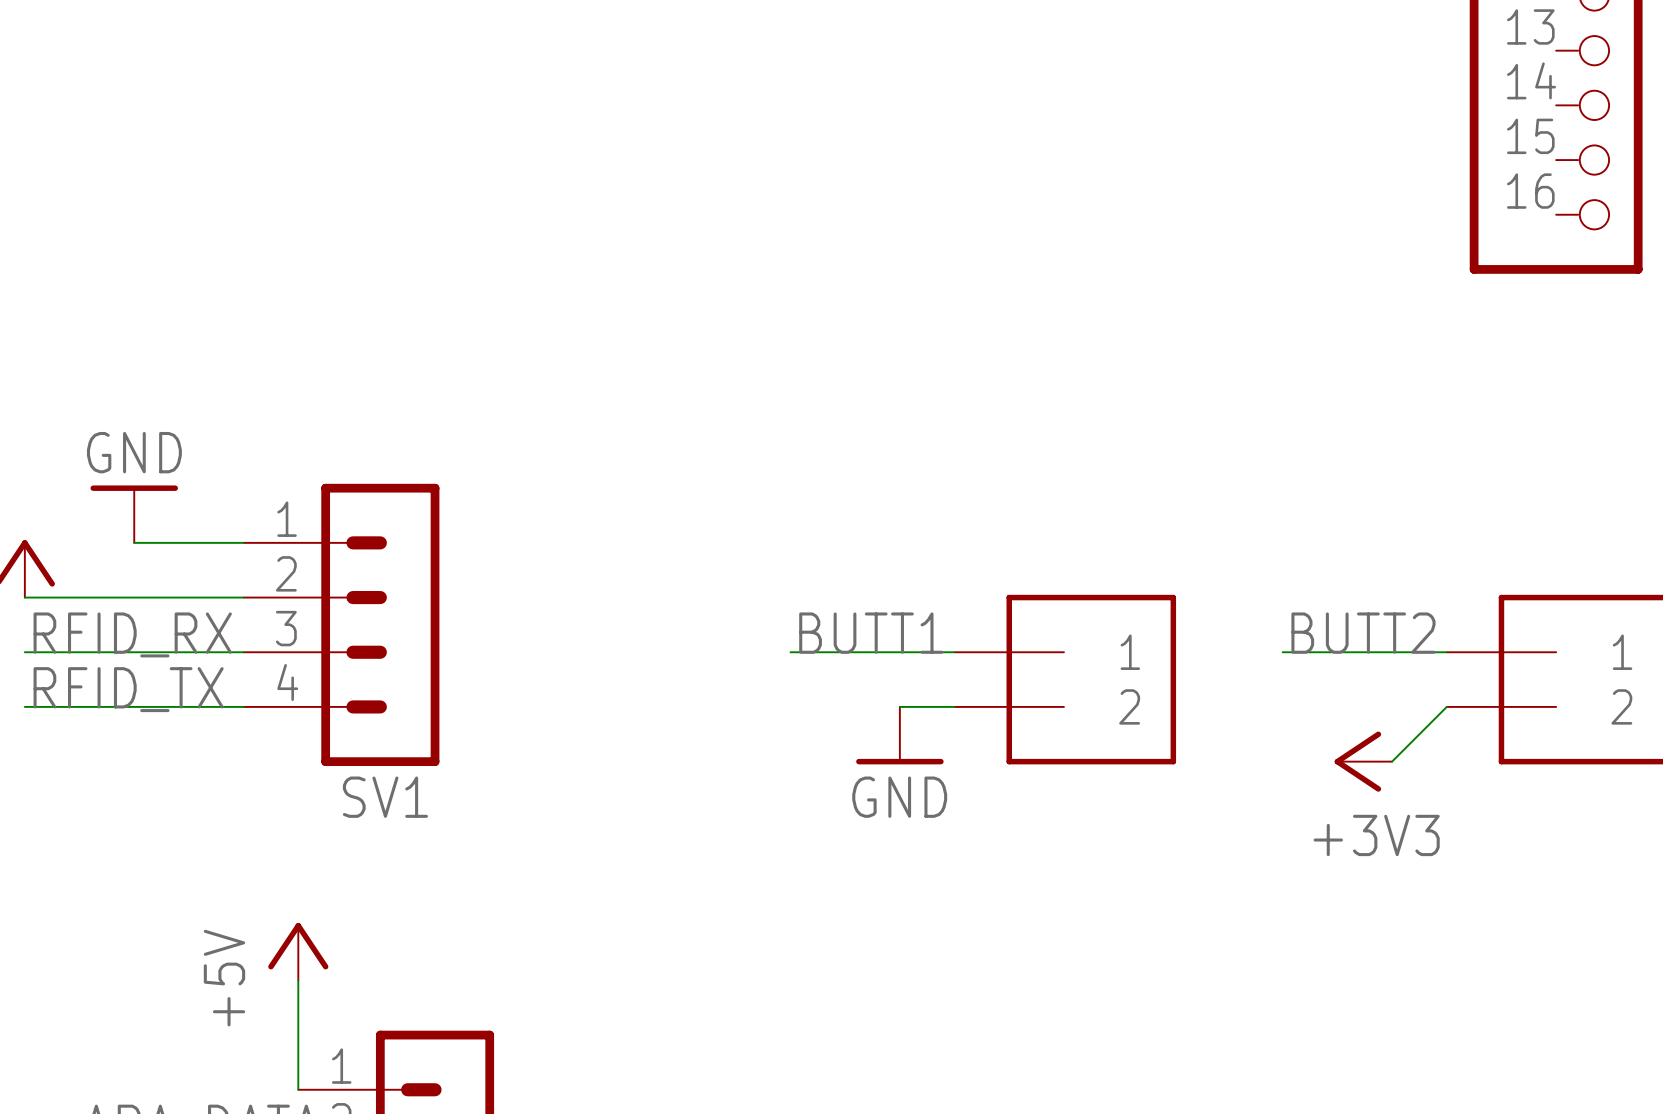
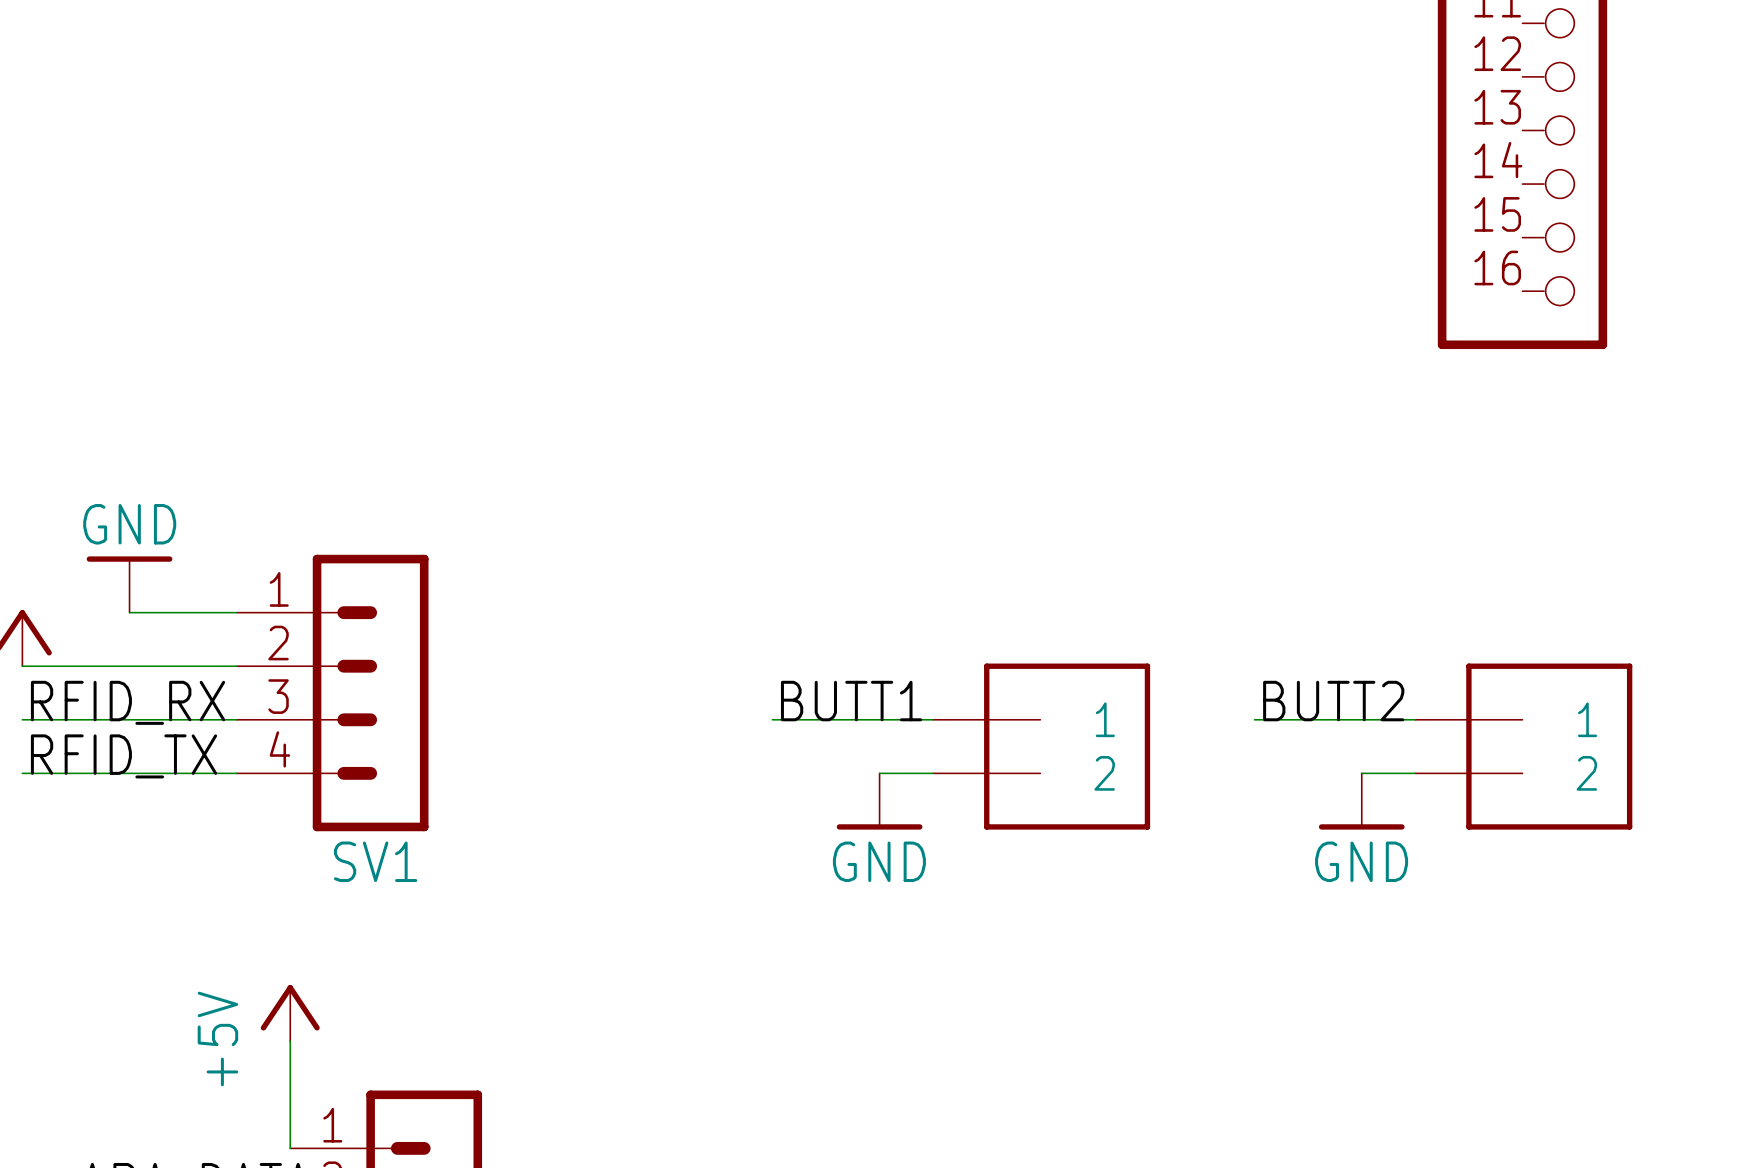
wire: (1446, 706) (1392, 761) -> (1415, 773) (1361, 773)
power symbol: none -> GND (1361, 801)
power symbol: +3V3 (1363, 761) -> none

